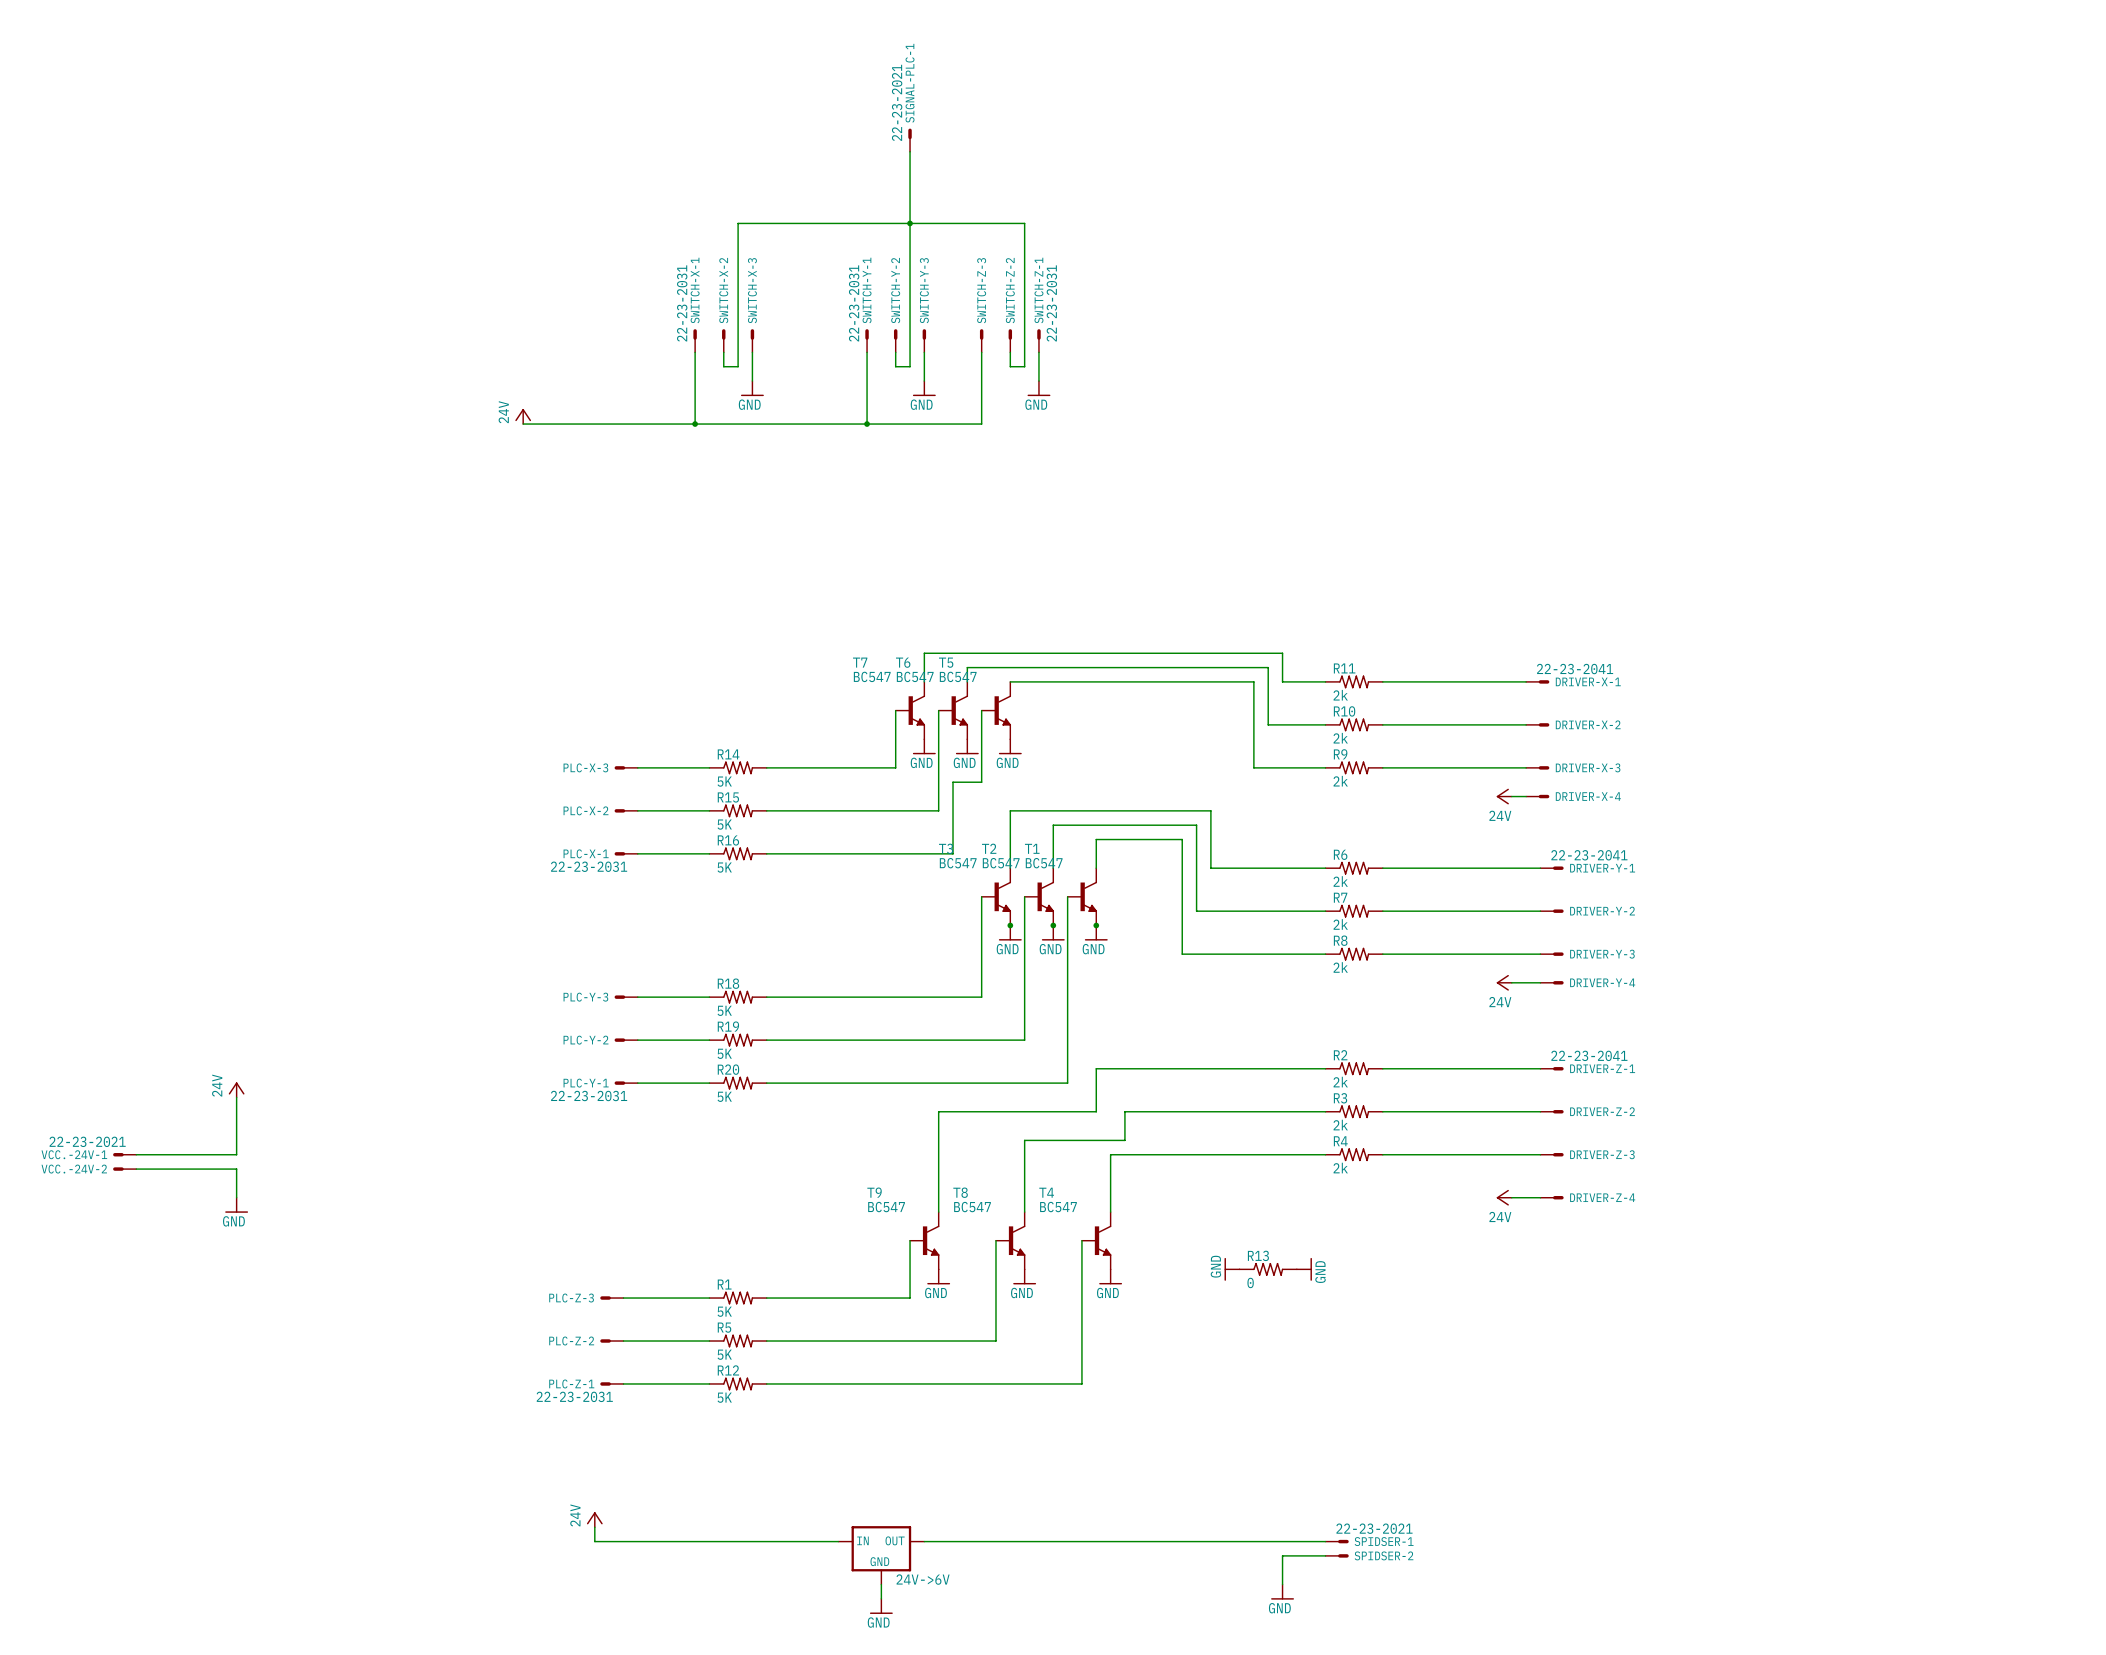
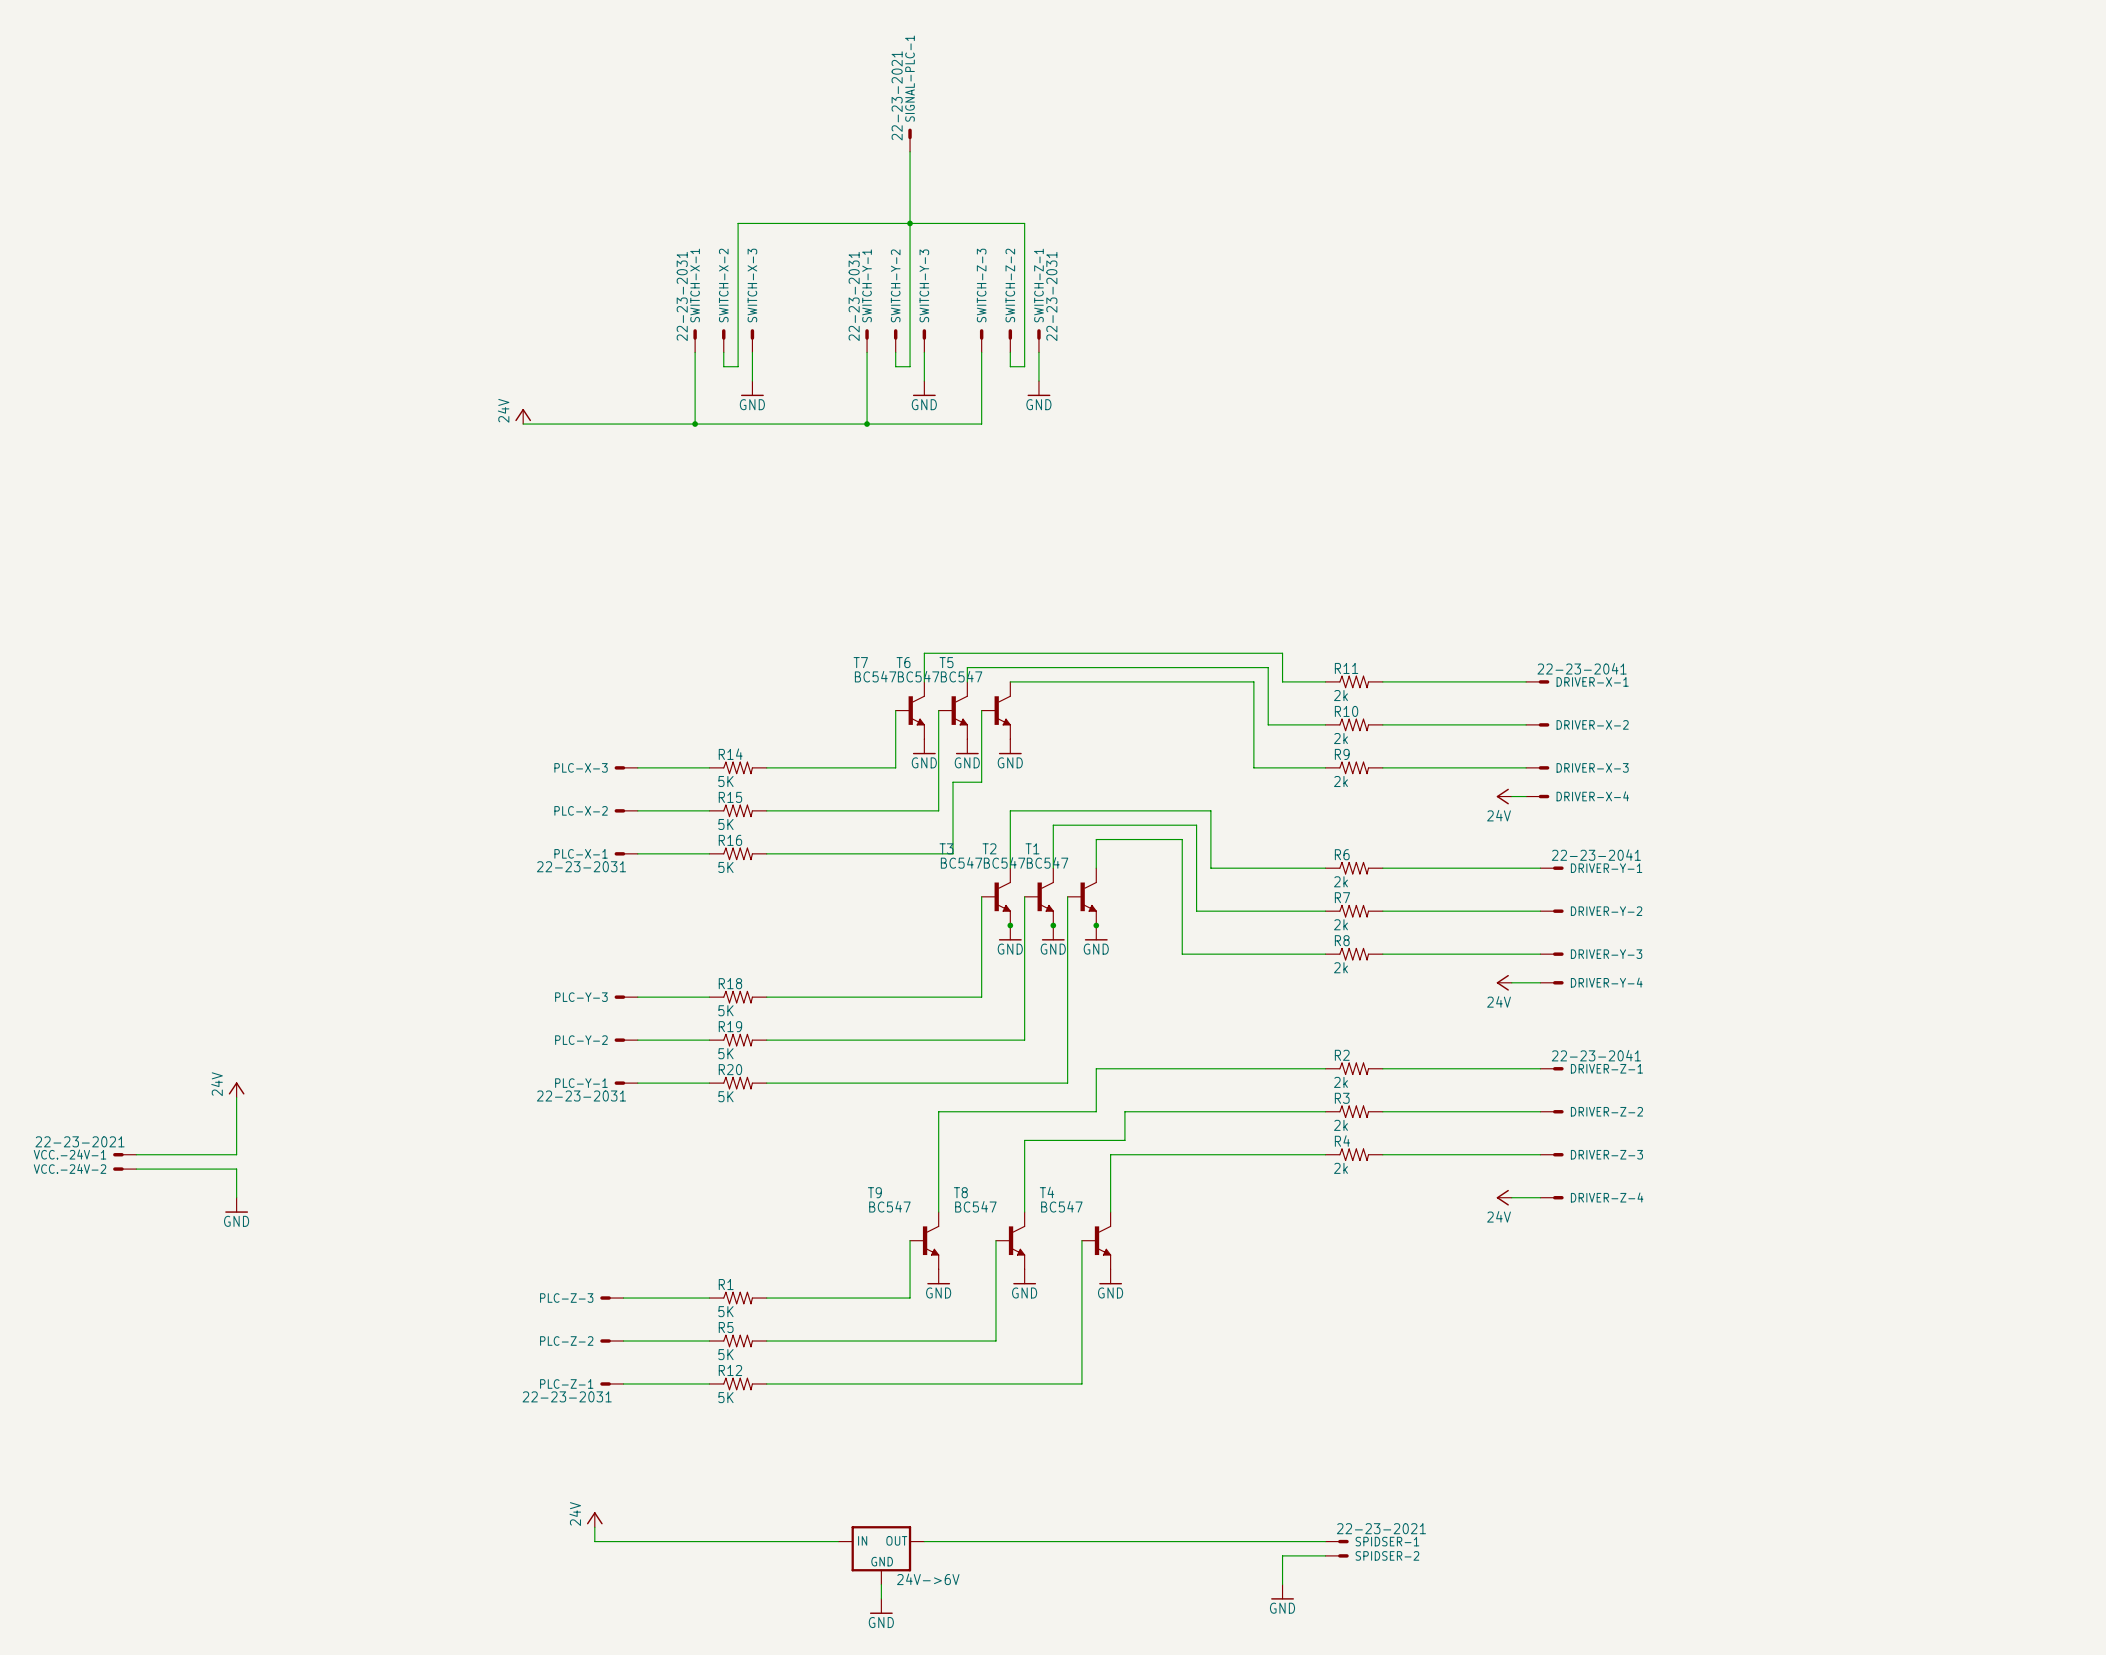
power symbol: GND (1232, 1269) -> none
R13: 0 (1268, 1269) -> none
power symbol: GND (1304, 1269) -> none

